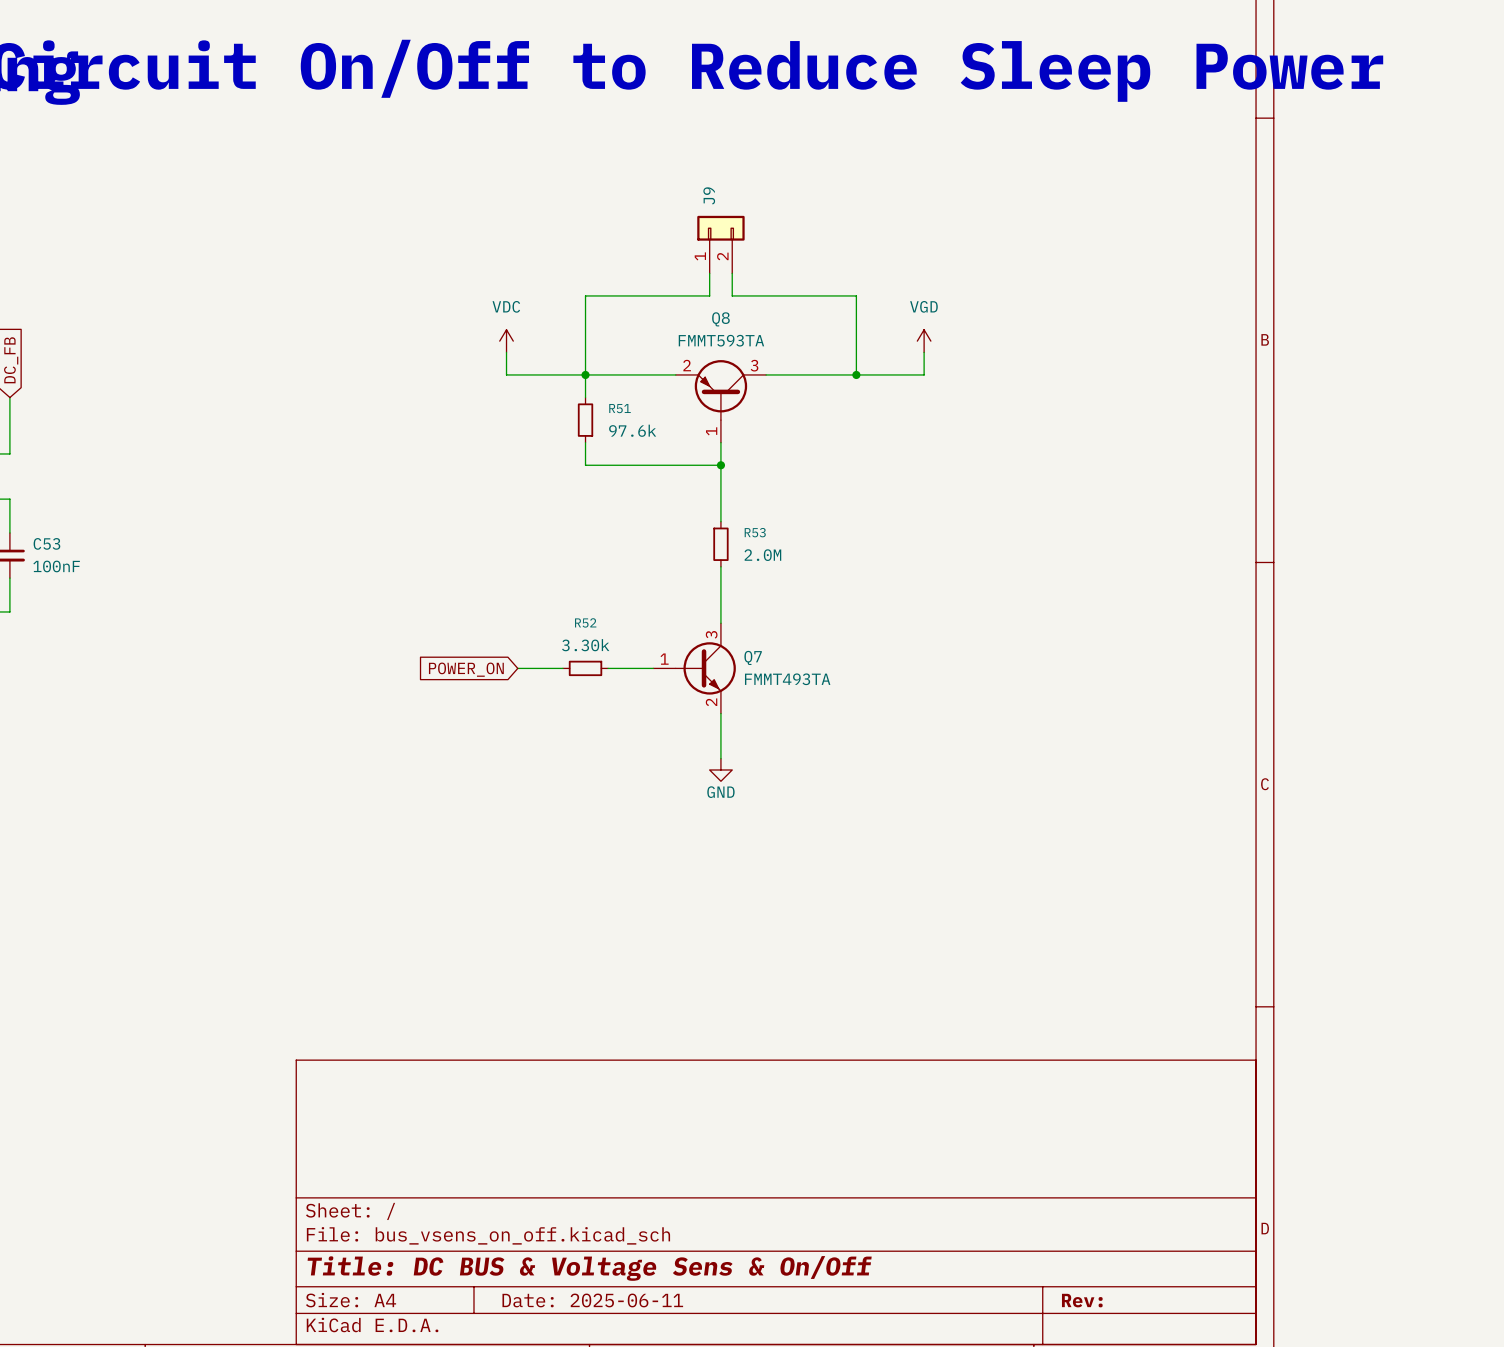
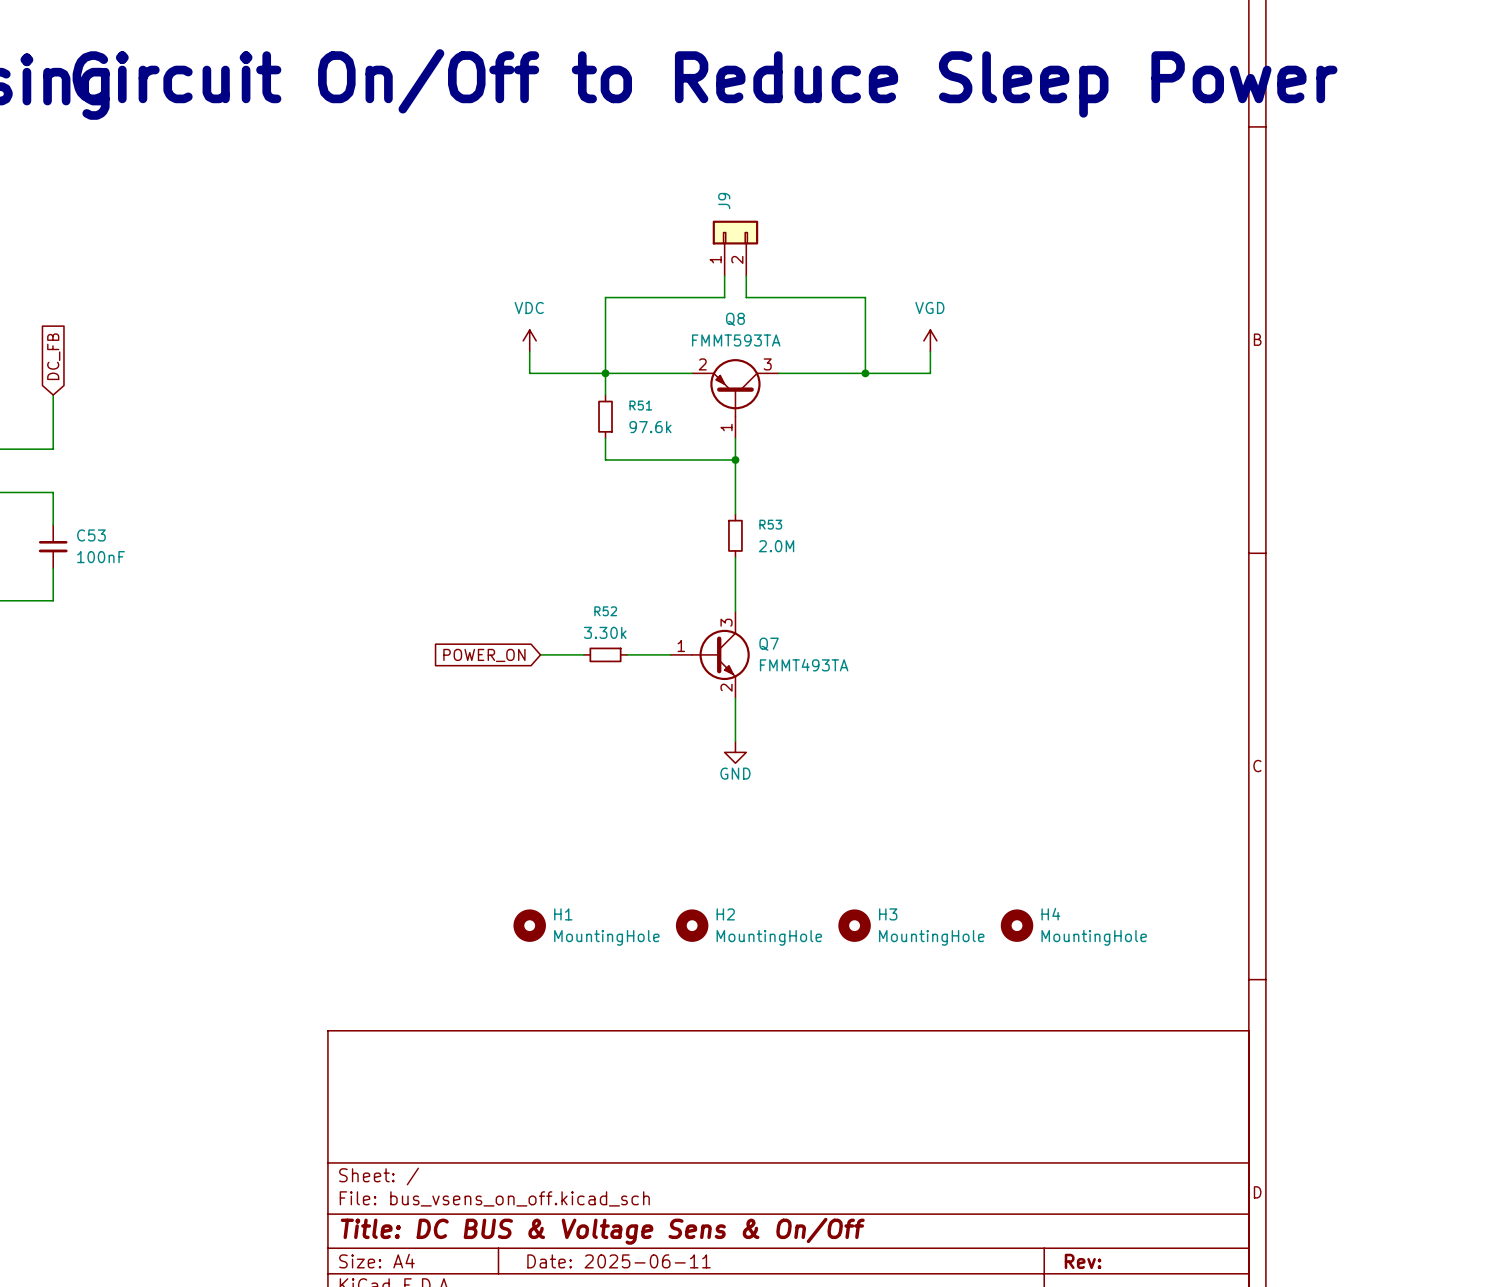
H1: none -> MountingHole (529, 925)
H2: none -> MountingHole (692, 925)
H3: none -> MountingHole (854, 925)
H4: none -> MountingHole (1017, 925)

